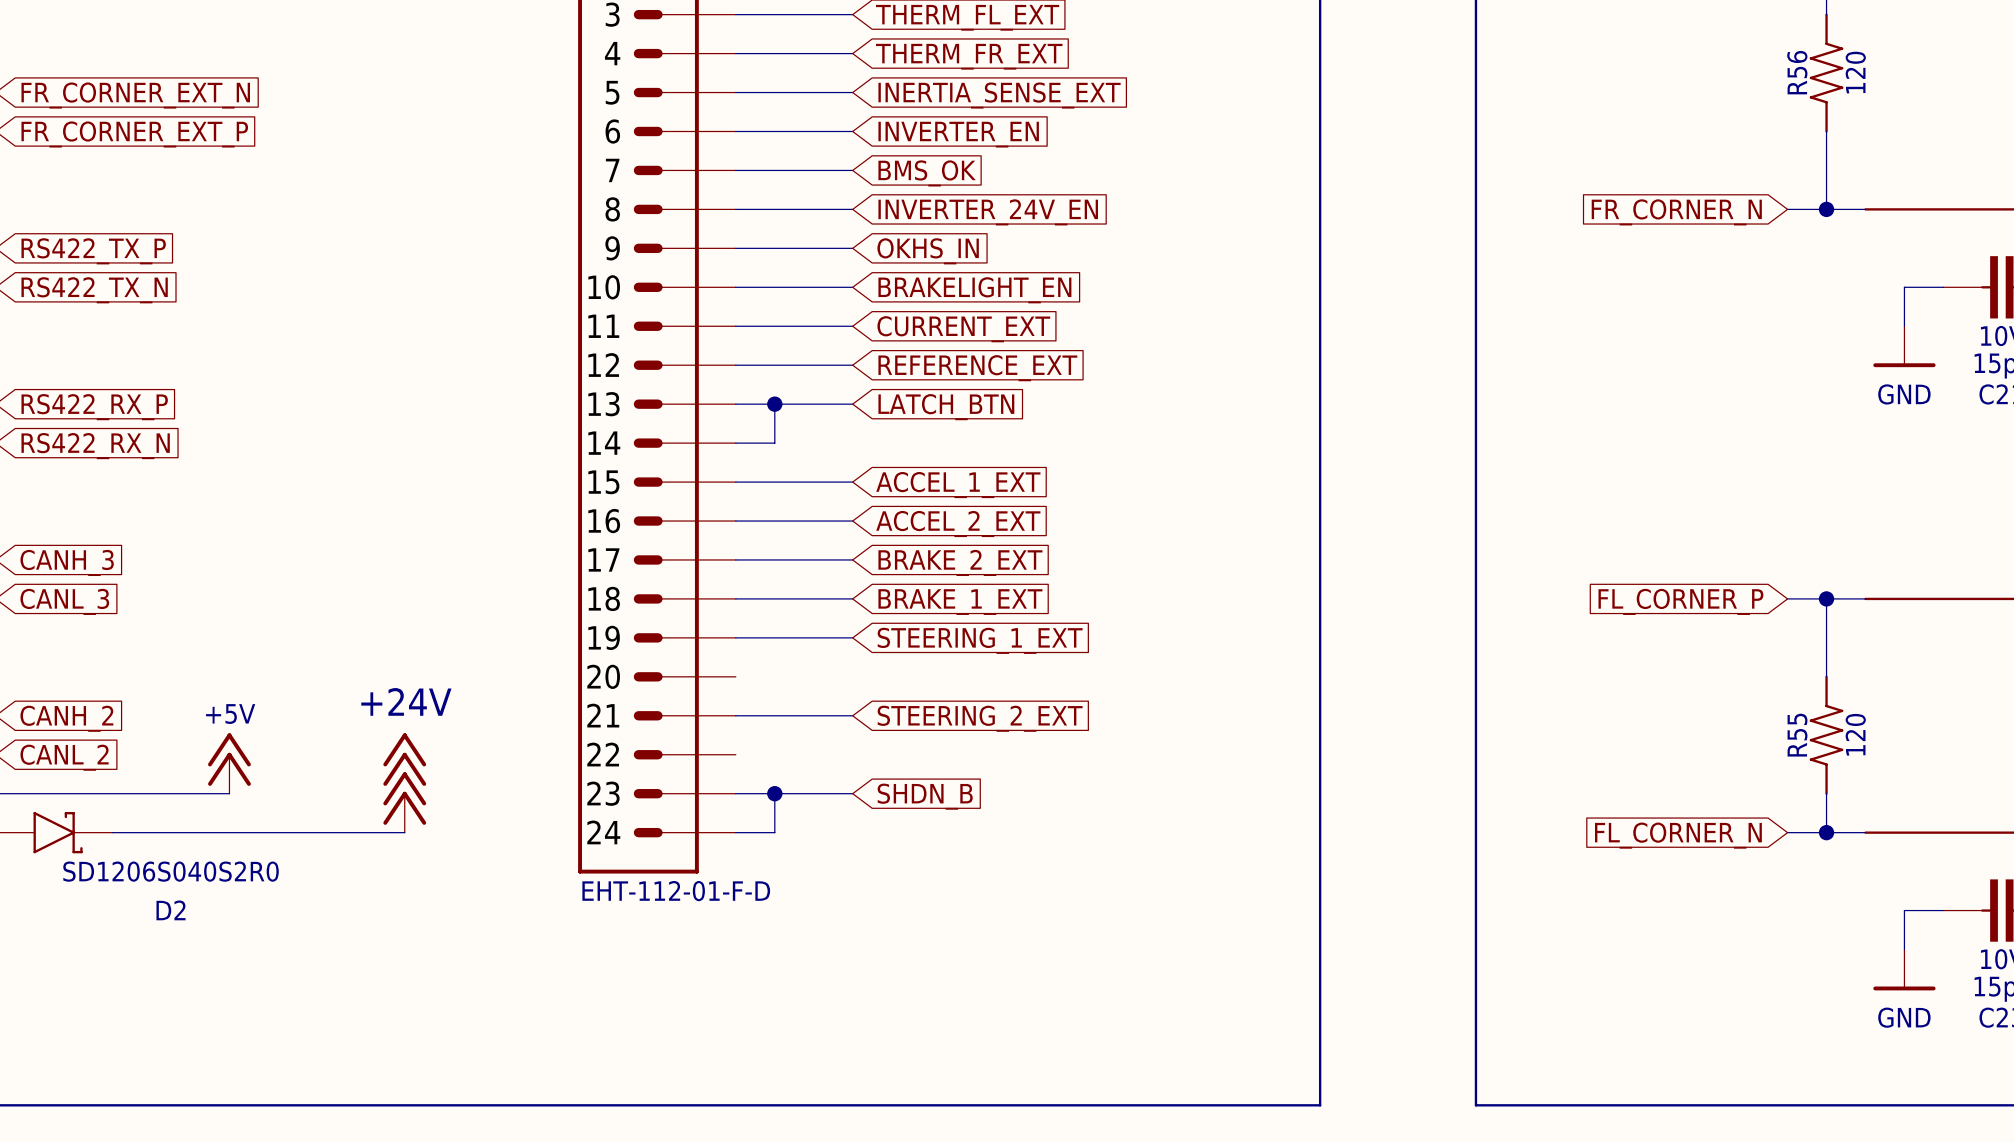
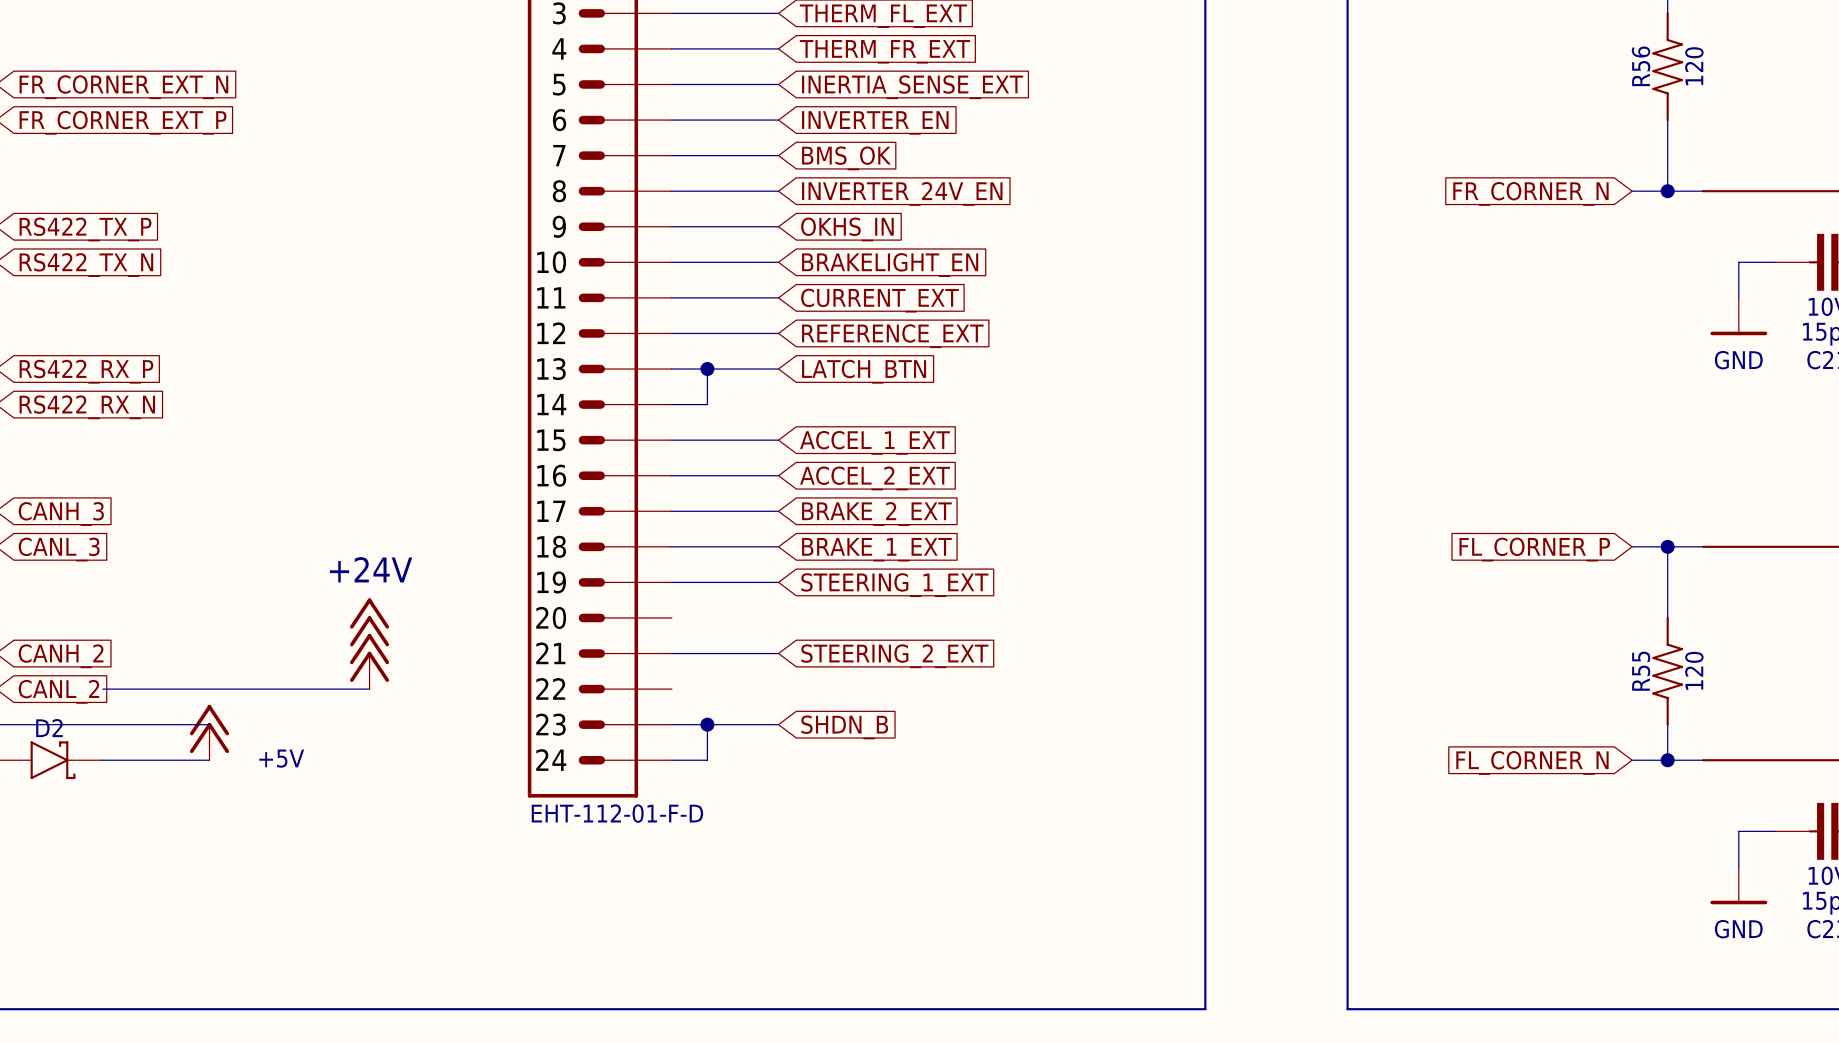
power symbol text position: +5V (230, 714) -> +5V (281, 758)
wire: none -> (102, 689) (369, 689)
power symbol position: +5V (229, 763) -> +5V (209, 732)
power symbol position: +24V (404, 782) -> +24V (369, 643)
wire: (229, 832) (404, 832) -> none
D2 text: SD1206S040S2R0 (171, 871) -> none
D2 name position: D2 (171, 910) -> D2 (49, 728)

